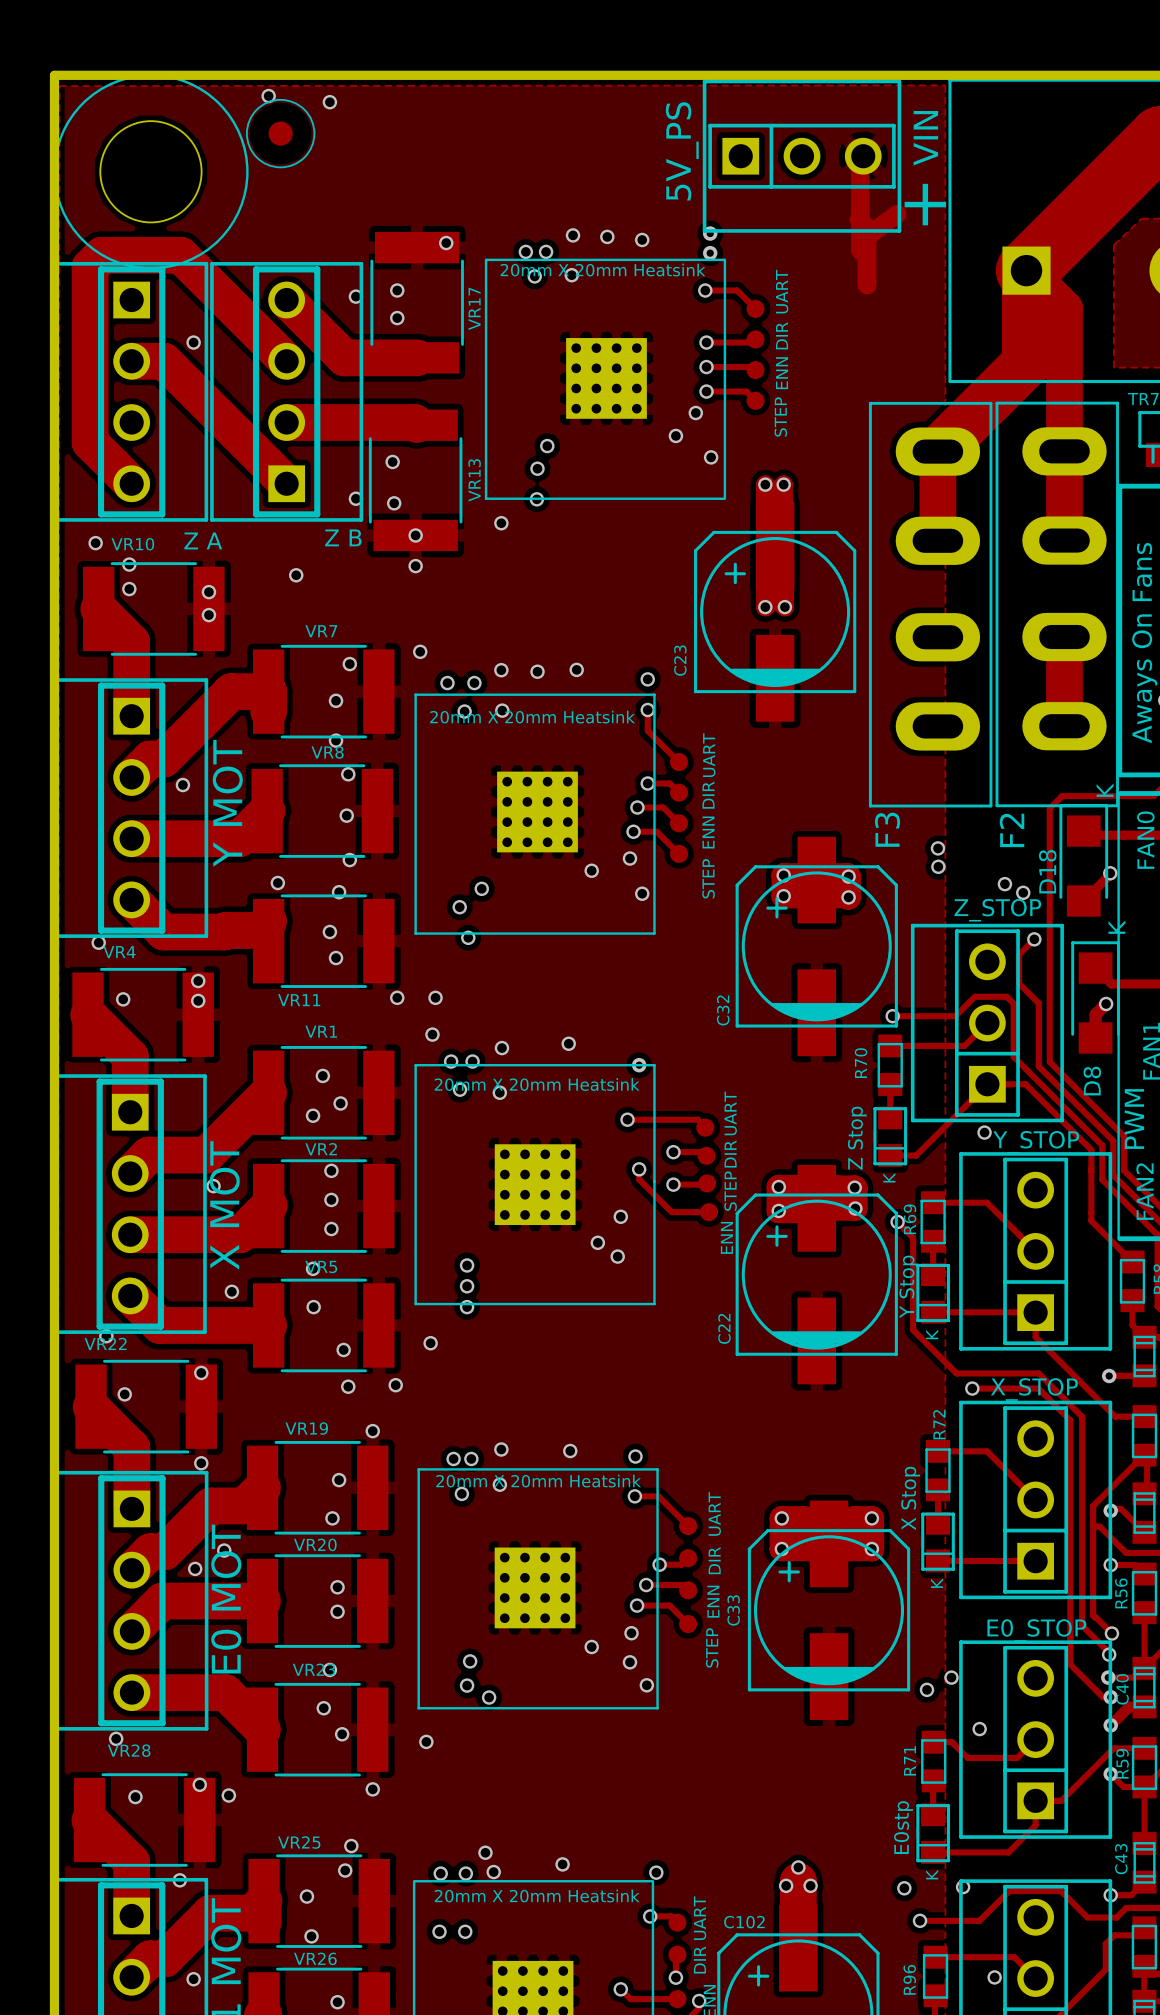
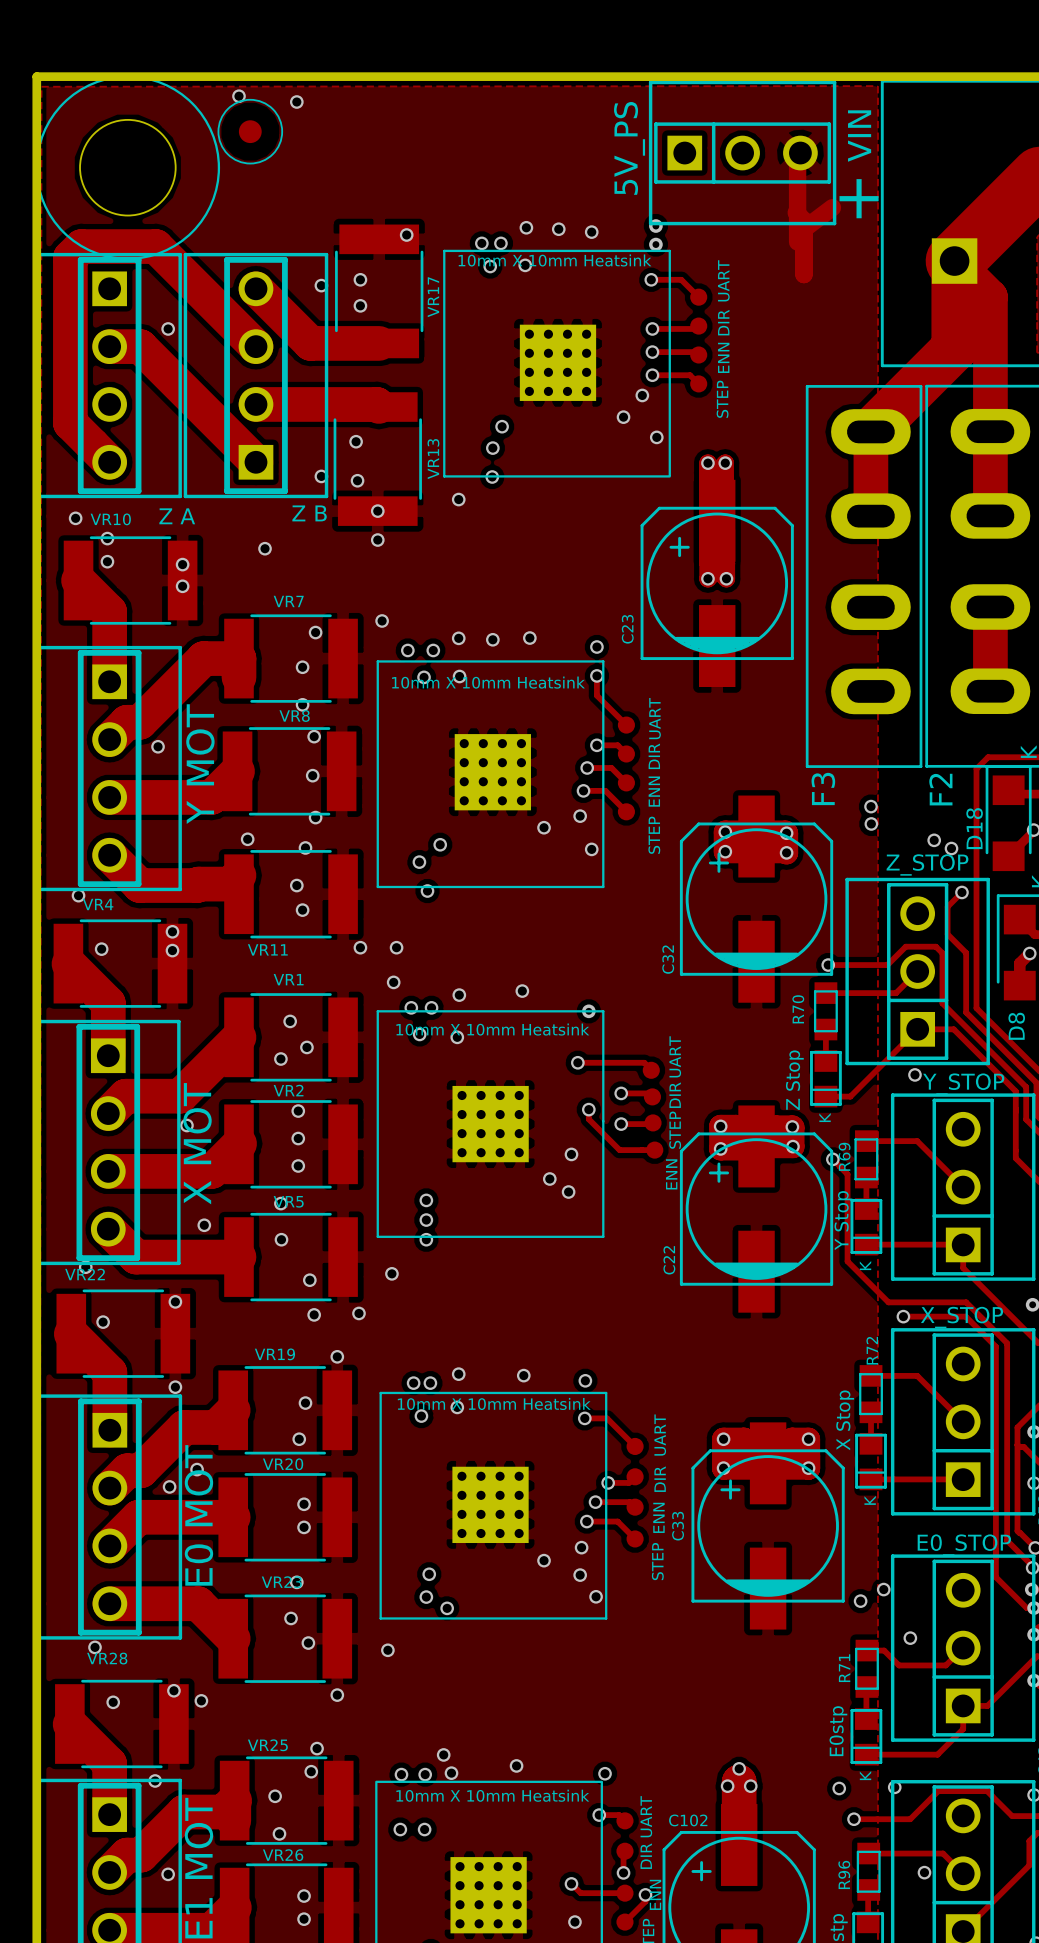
text: 20mm X 20mm Heatsink (603, 270) -> 10mm X 10mm Heatsink (554, 260)
text: 20mm X 20mm Heatsink (532, 717) -> 10mm X 10mm Heatsink (488, 682)
text: 20mm X 20mm Heatsink (537, 1084) -> 10mm X 10mm Heatsink (492, 1029)
text: 20mm X 20mm Heatsink (538, 1481) -> 10mm X 10mm Heatsink (494, 1403)
text: 20mm X 20mm Heatsink (537, 1895) -> 10mm X 10mm Heatsink (492, 1795)

